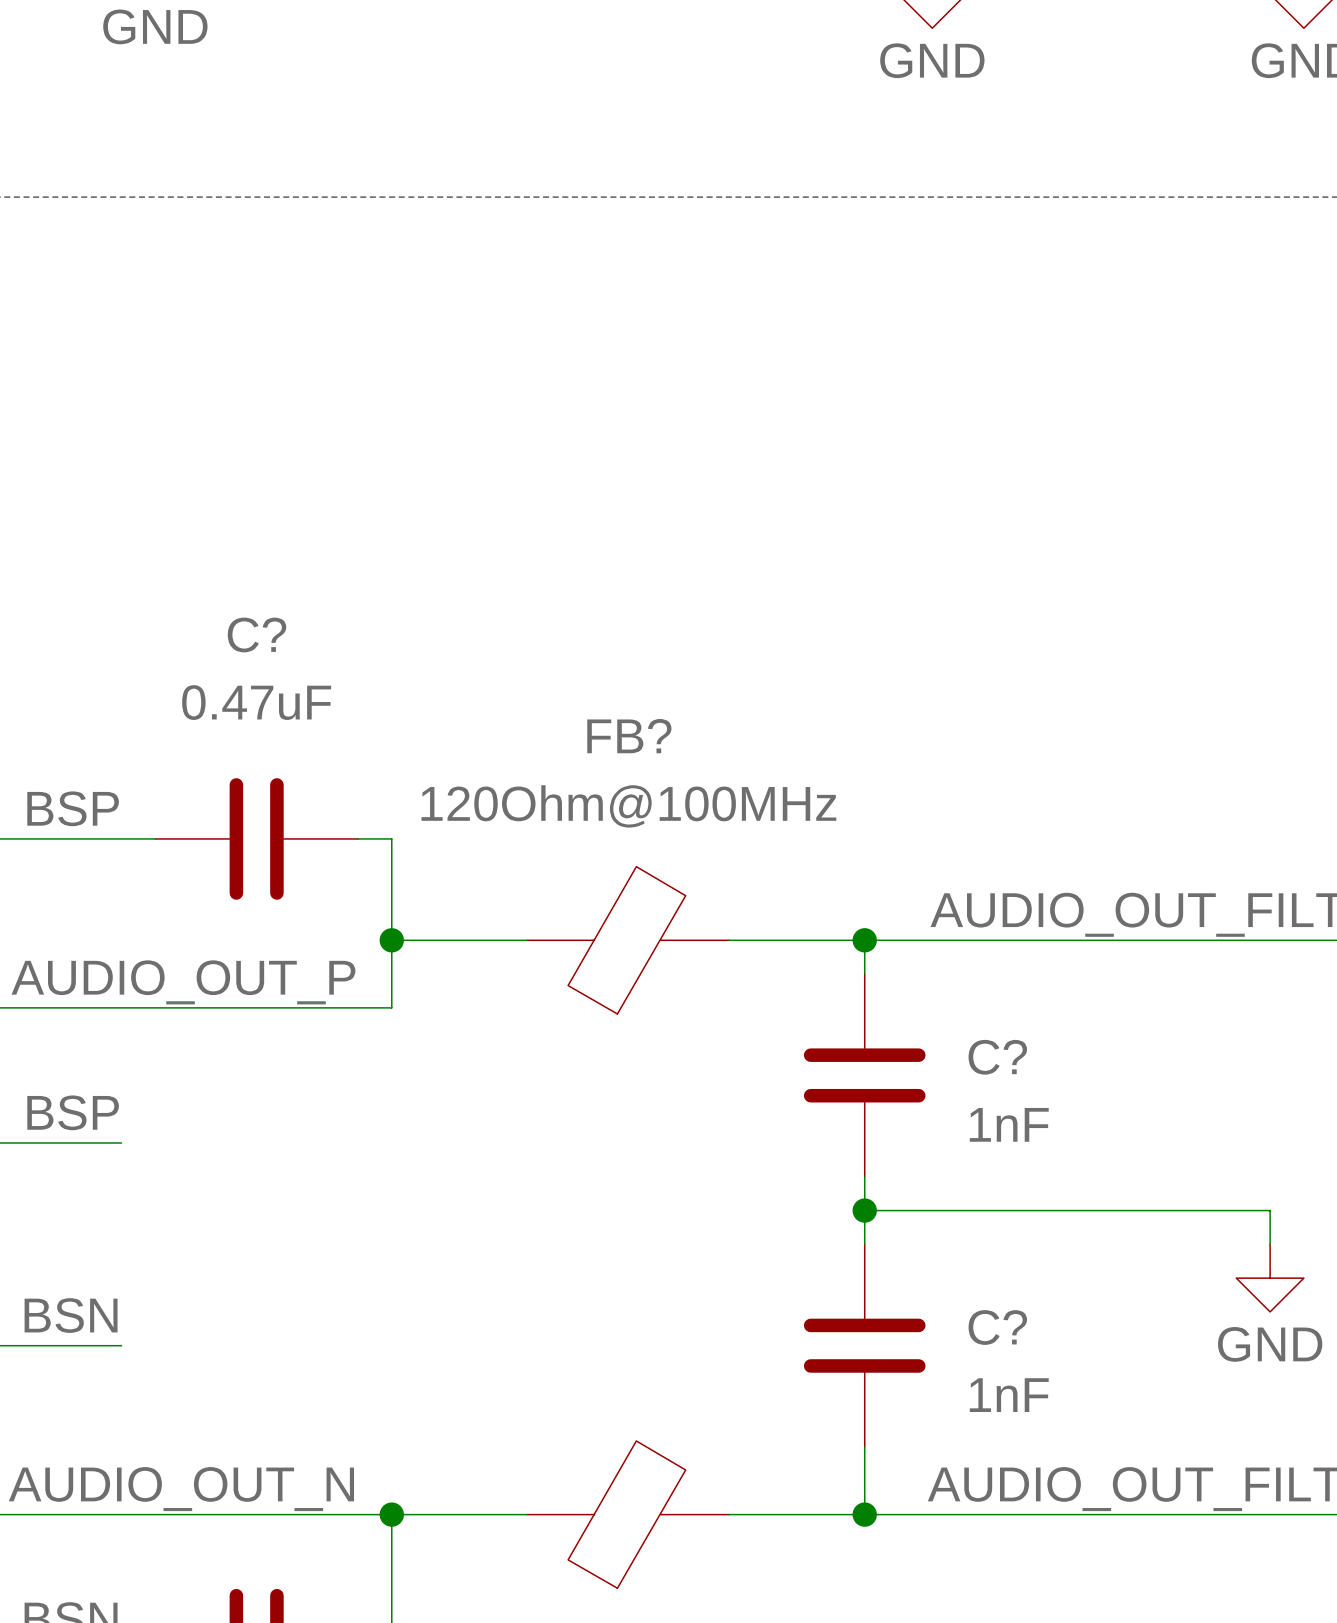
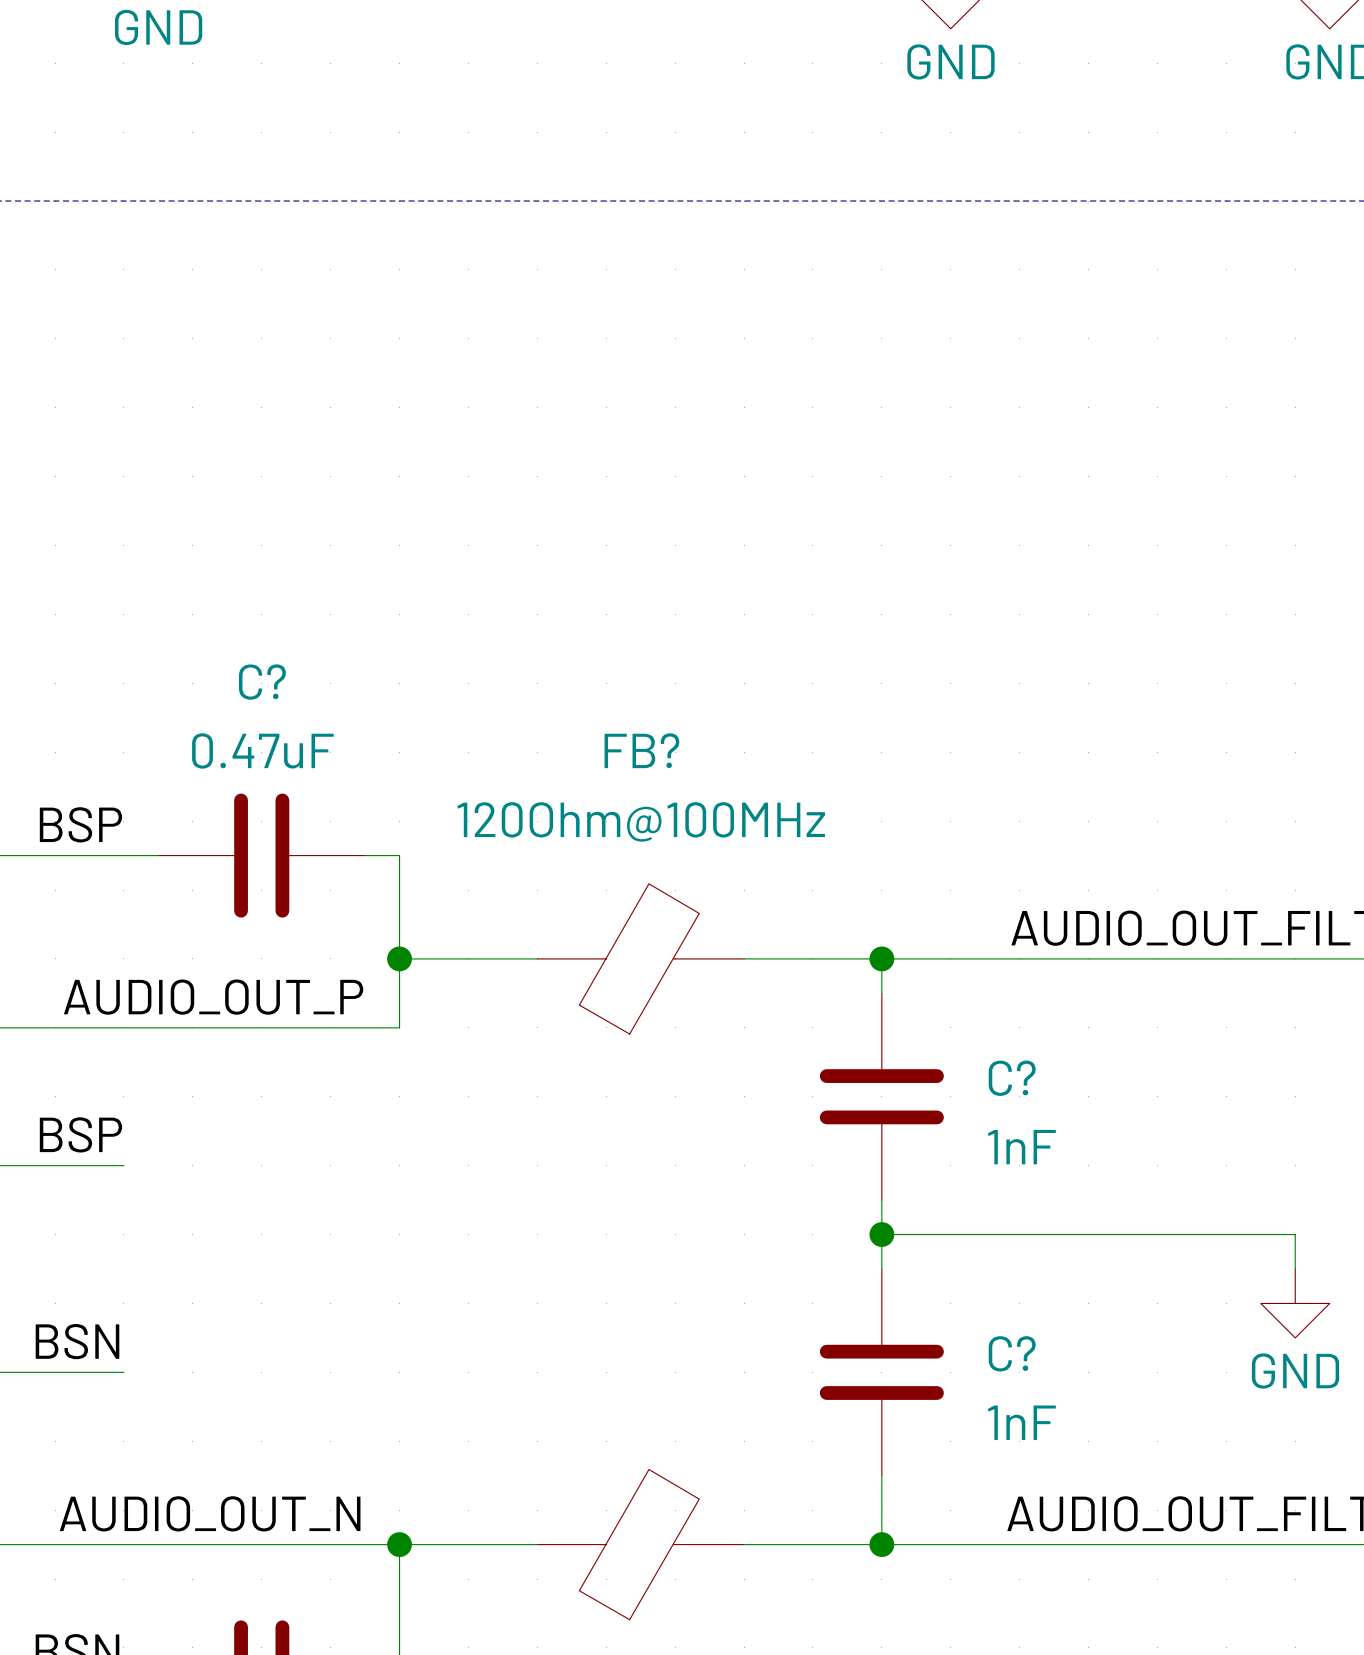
C? name position: C? (256, 635) -> C? (262, 682)
C? value position: 0.47uF (256, 702) -> 0.47uF (262, 750)

